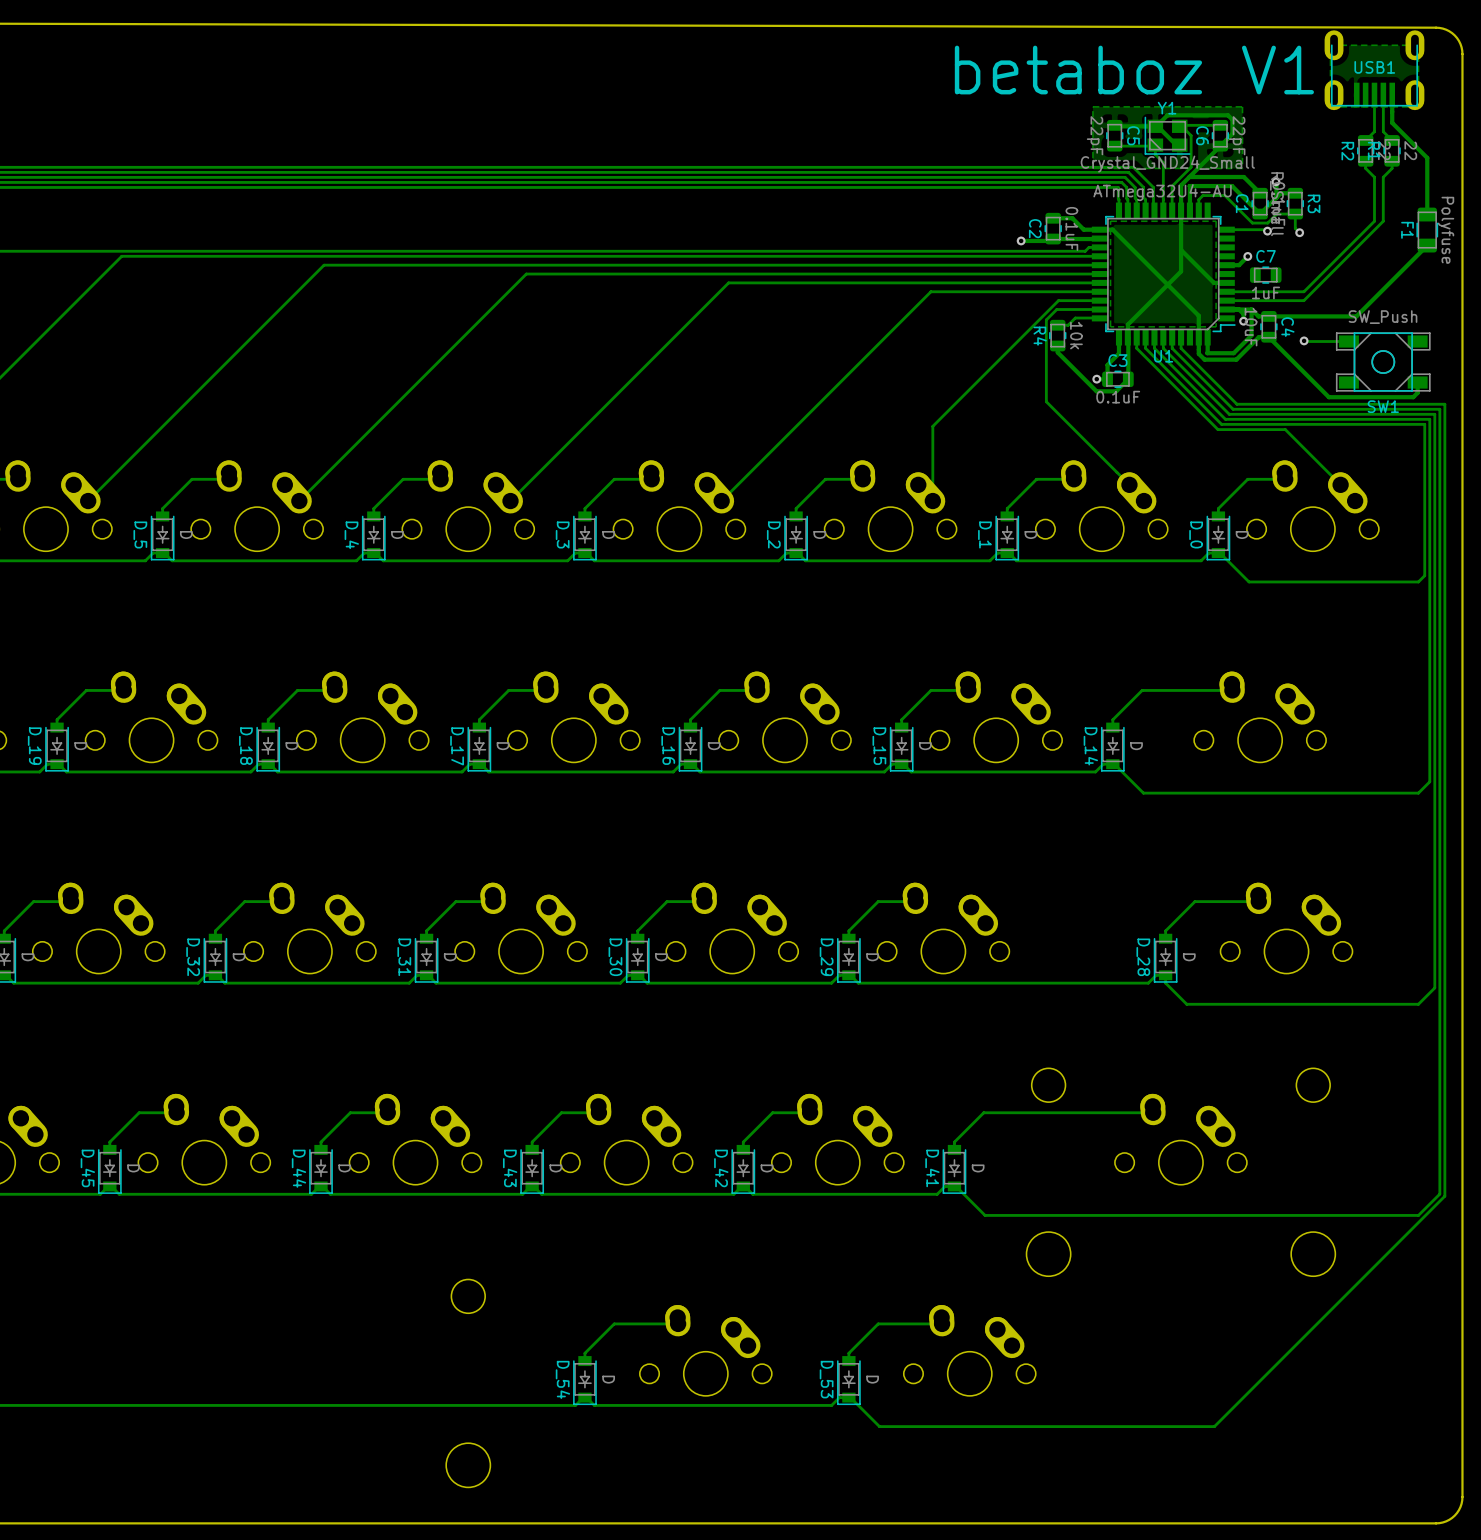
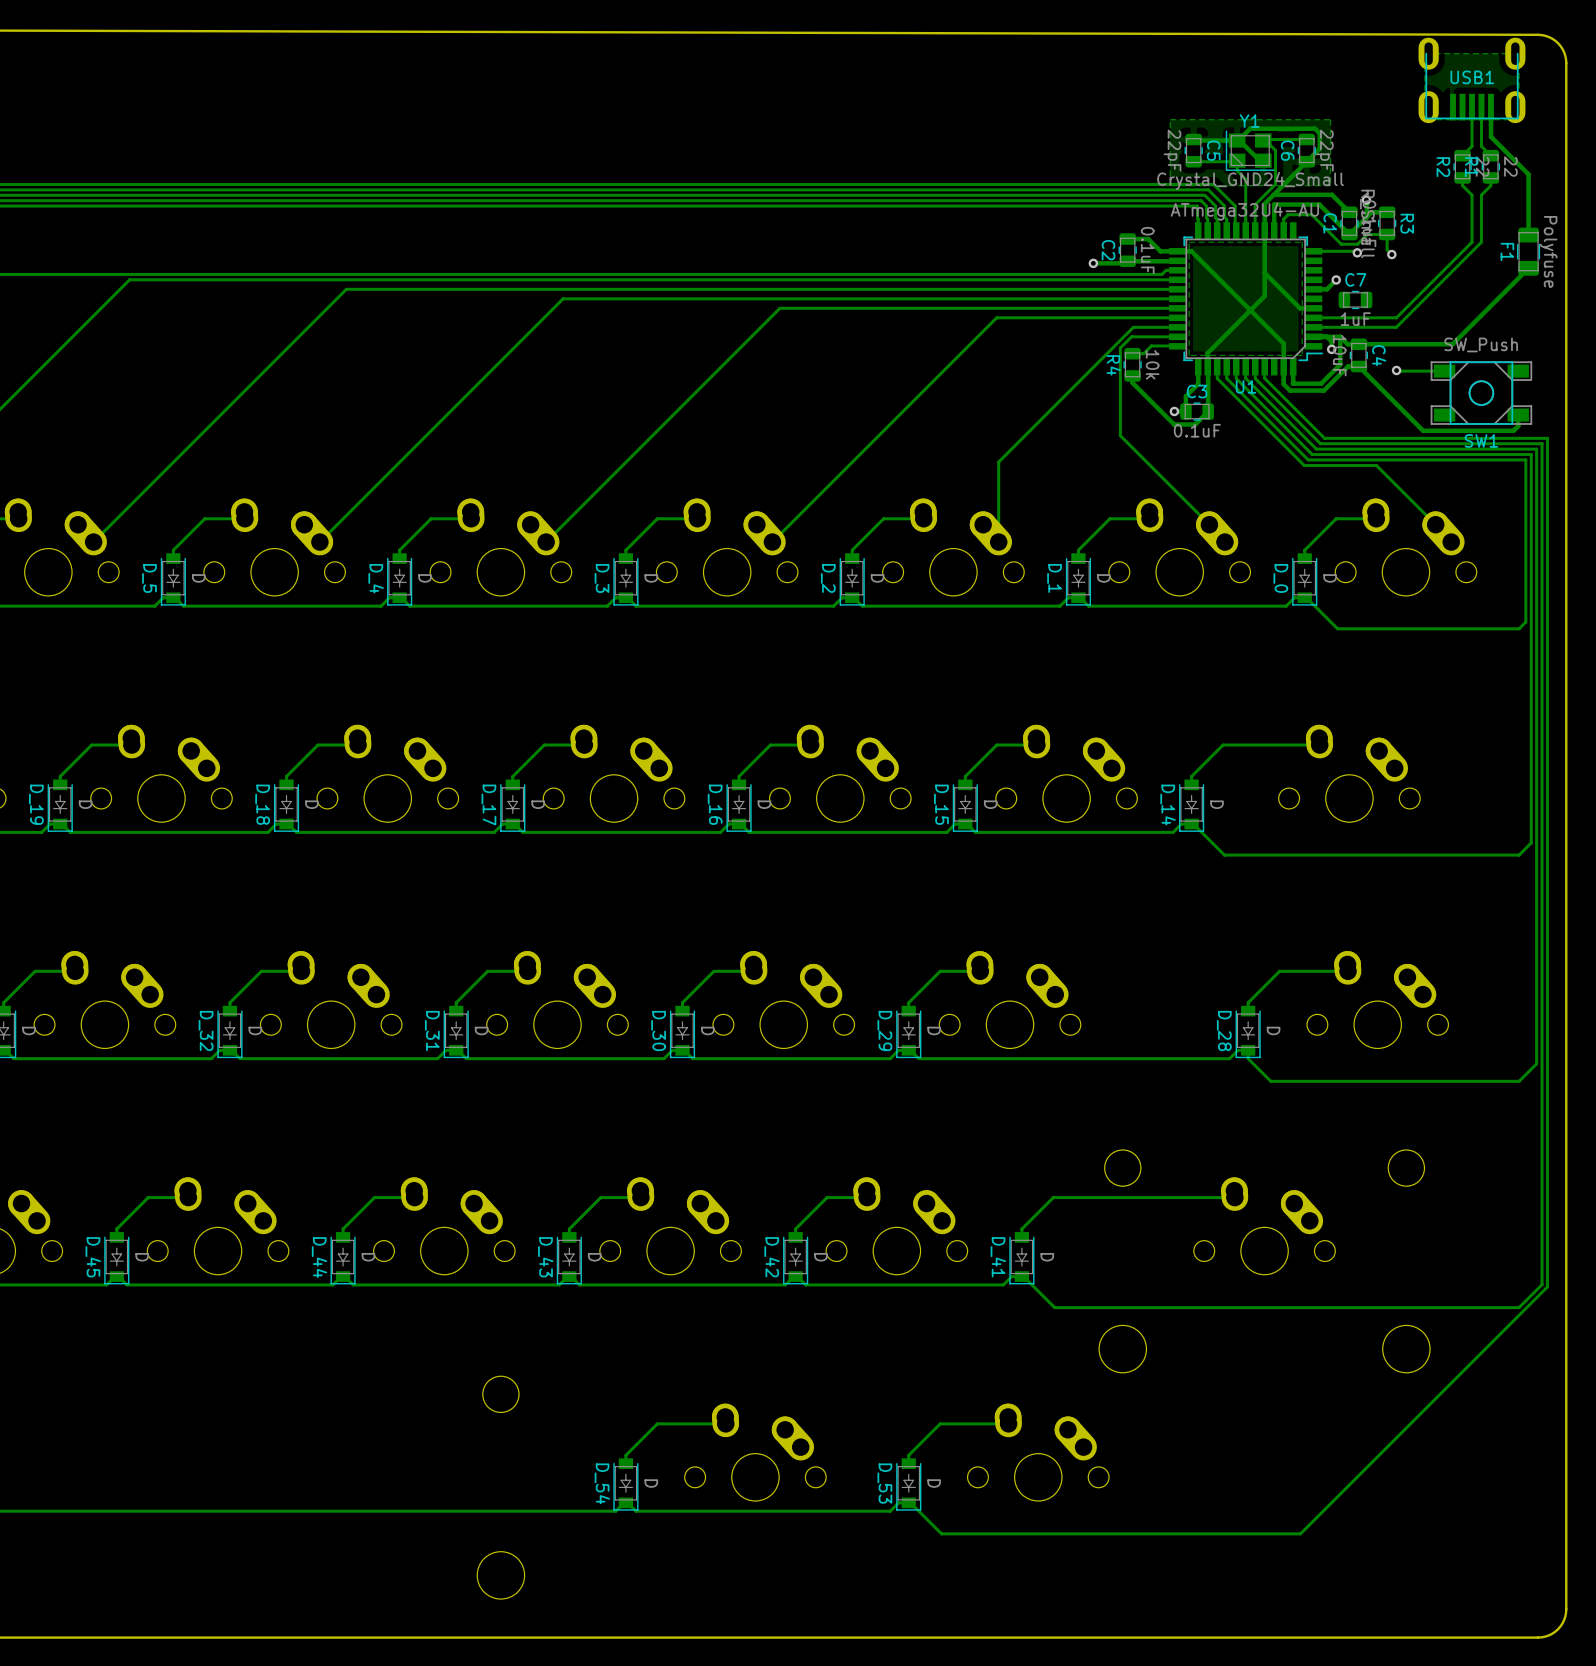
text: betaboz V1 (1134, 70) -> none

